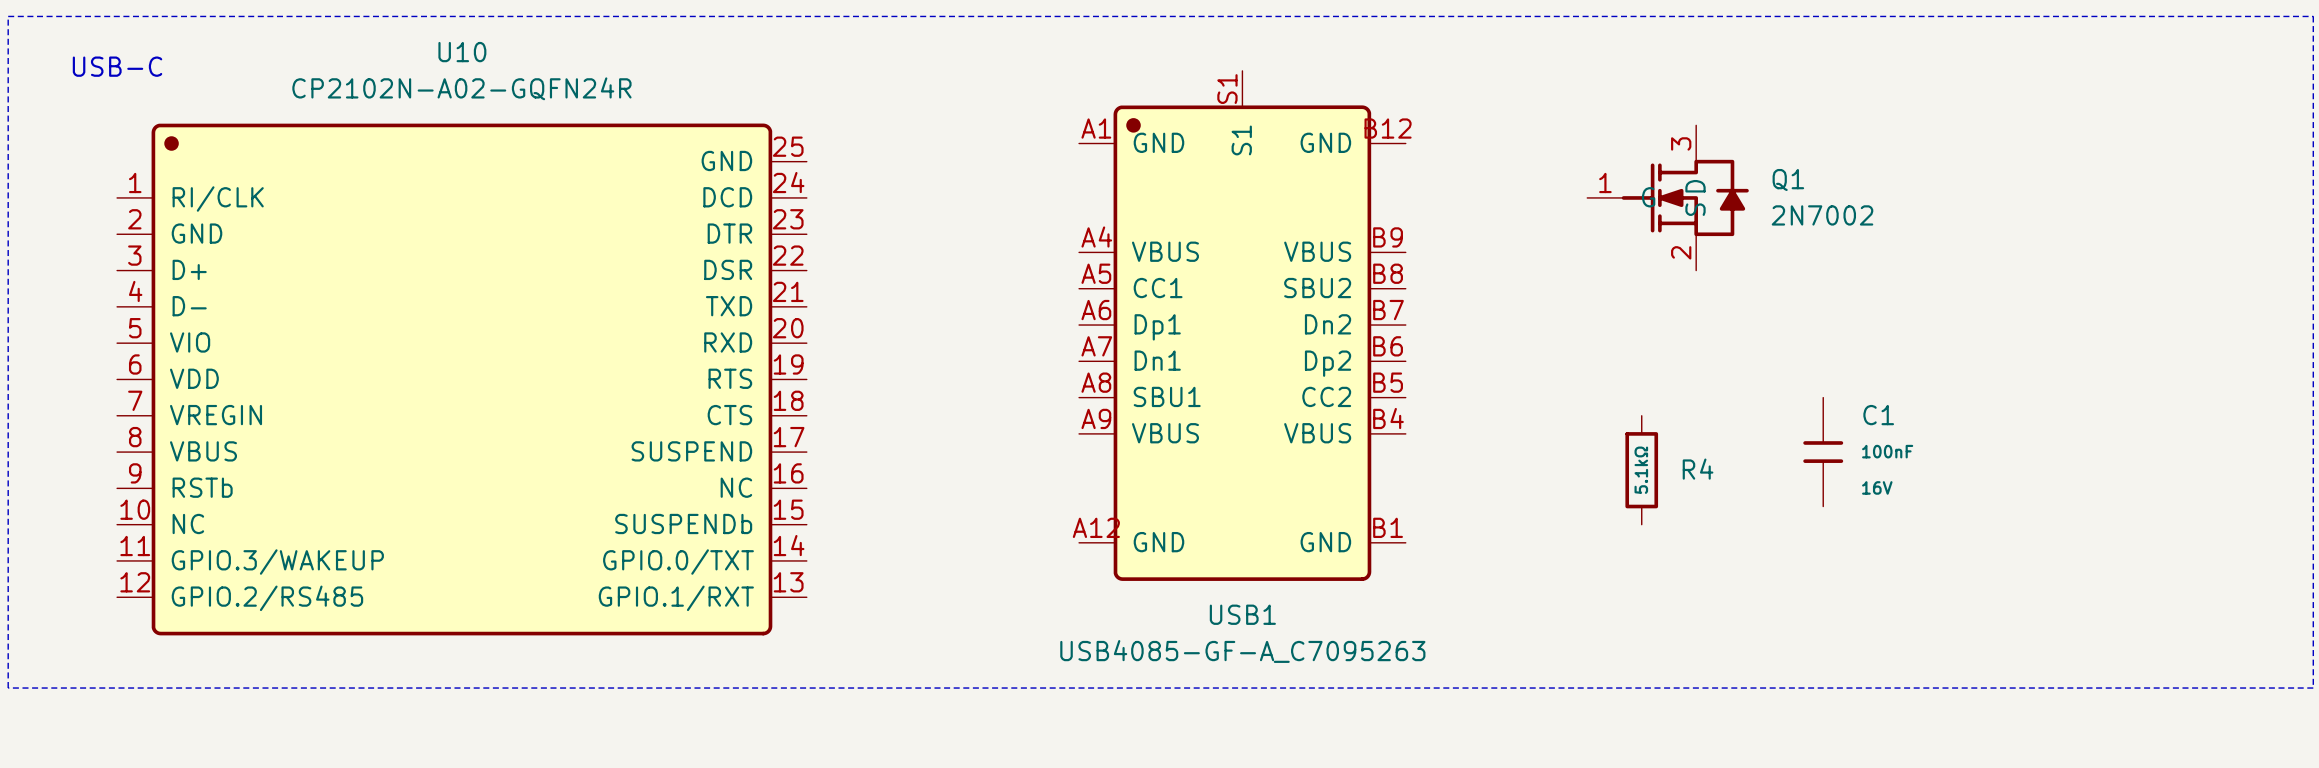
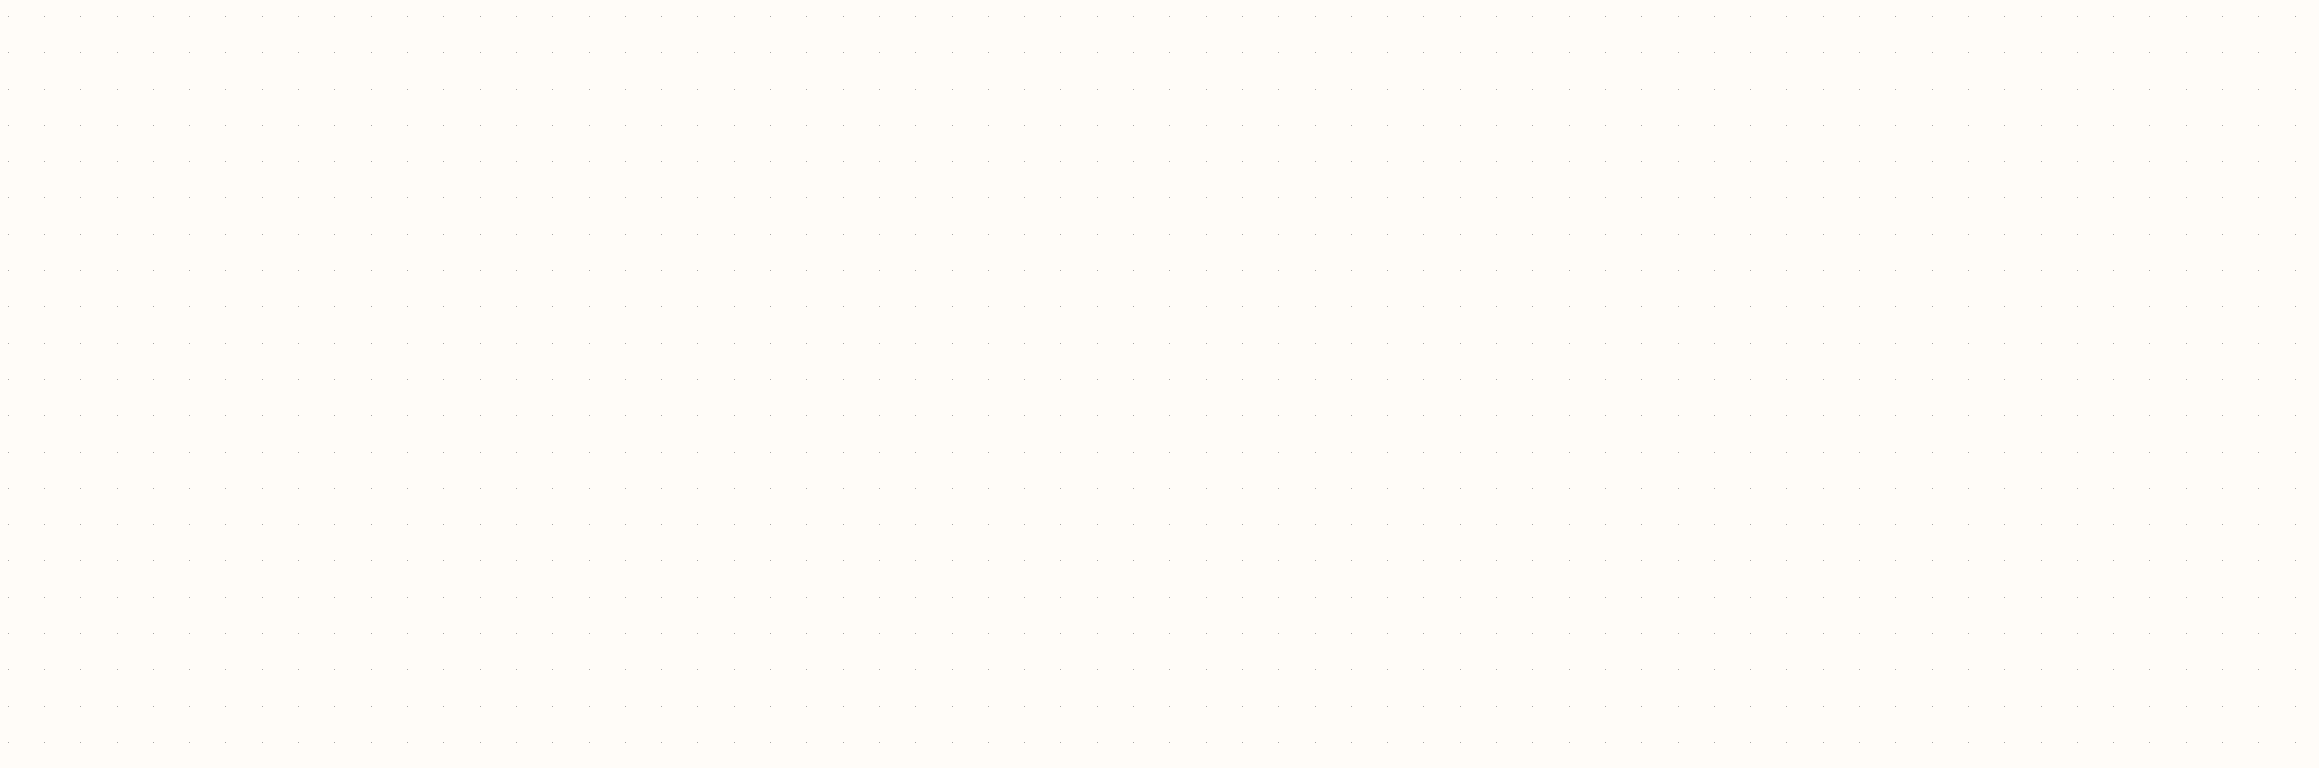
line: (8, 16) (8, 688) (2313, 688) (2313, 16) (8, 16) -> none
text: USB-C (117, 66) -> none
Q1: 2N7002 (1668, 197) -> none
USB1: USB4085-GF-A_C7095263 (1242, 325) -> none
U10: CP2102N-A02-GQFN24R (461, 379) -> none
C1: 100nF (1823, 452) -> none
R4: 5.1kΩ (1641, 470) -> none

